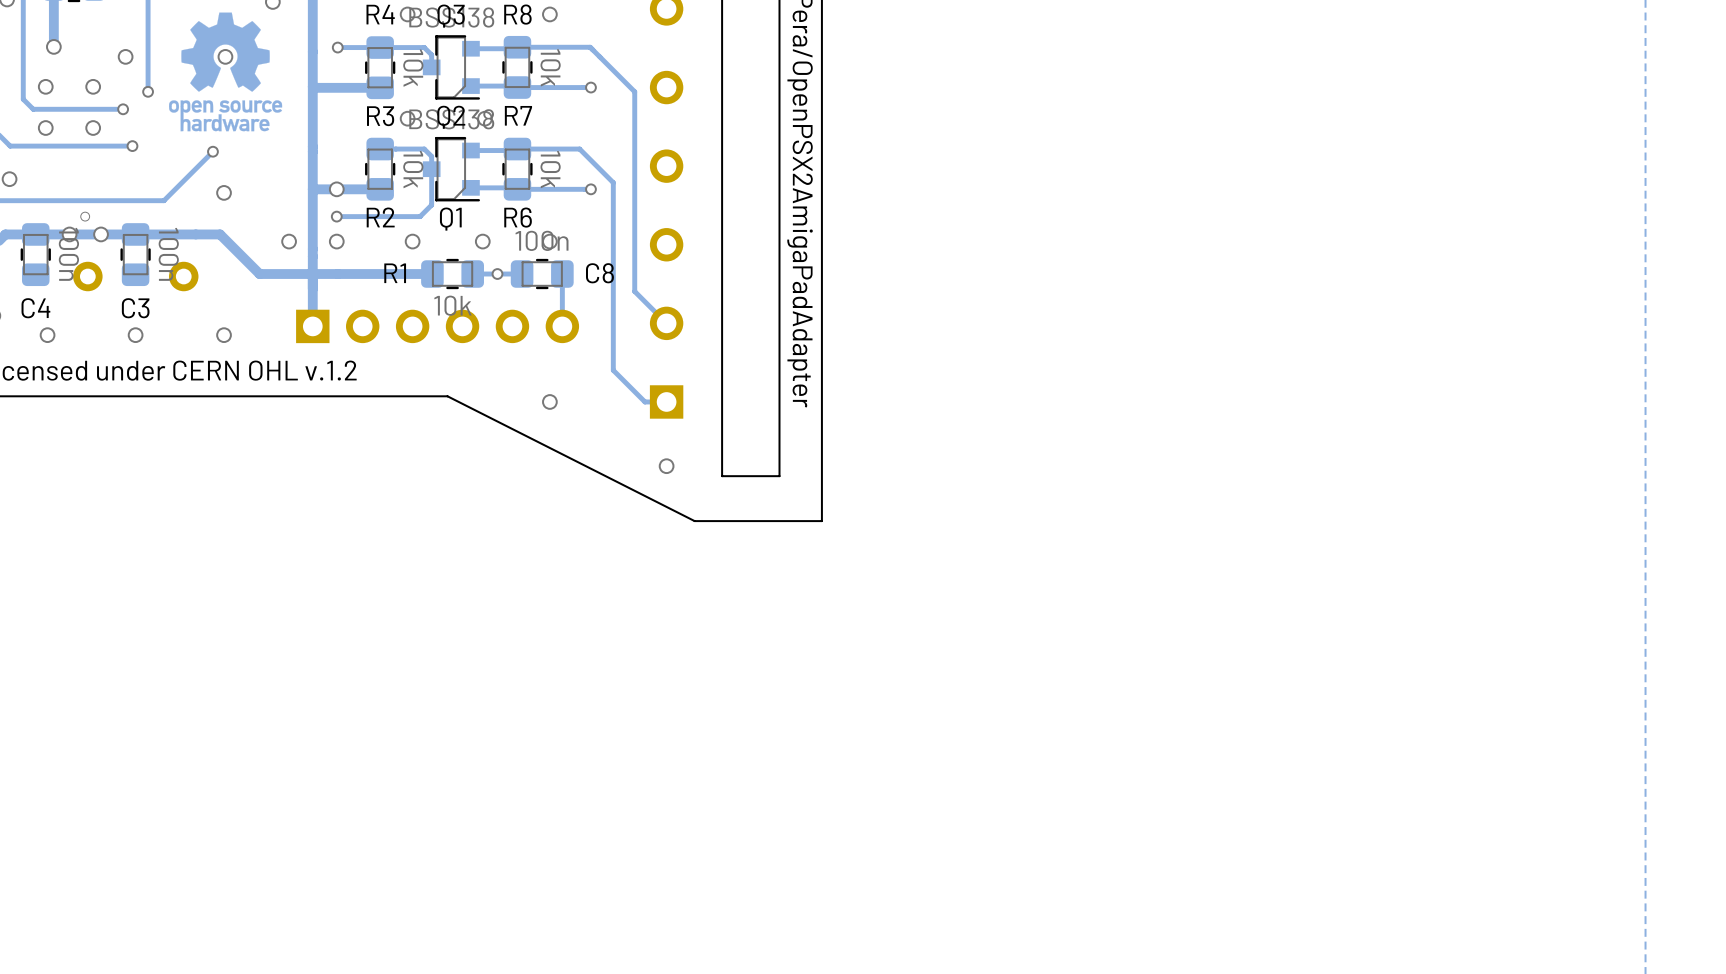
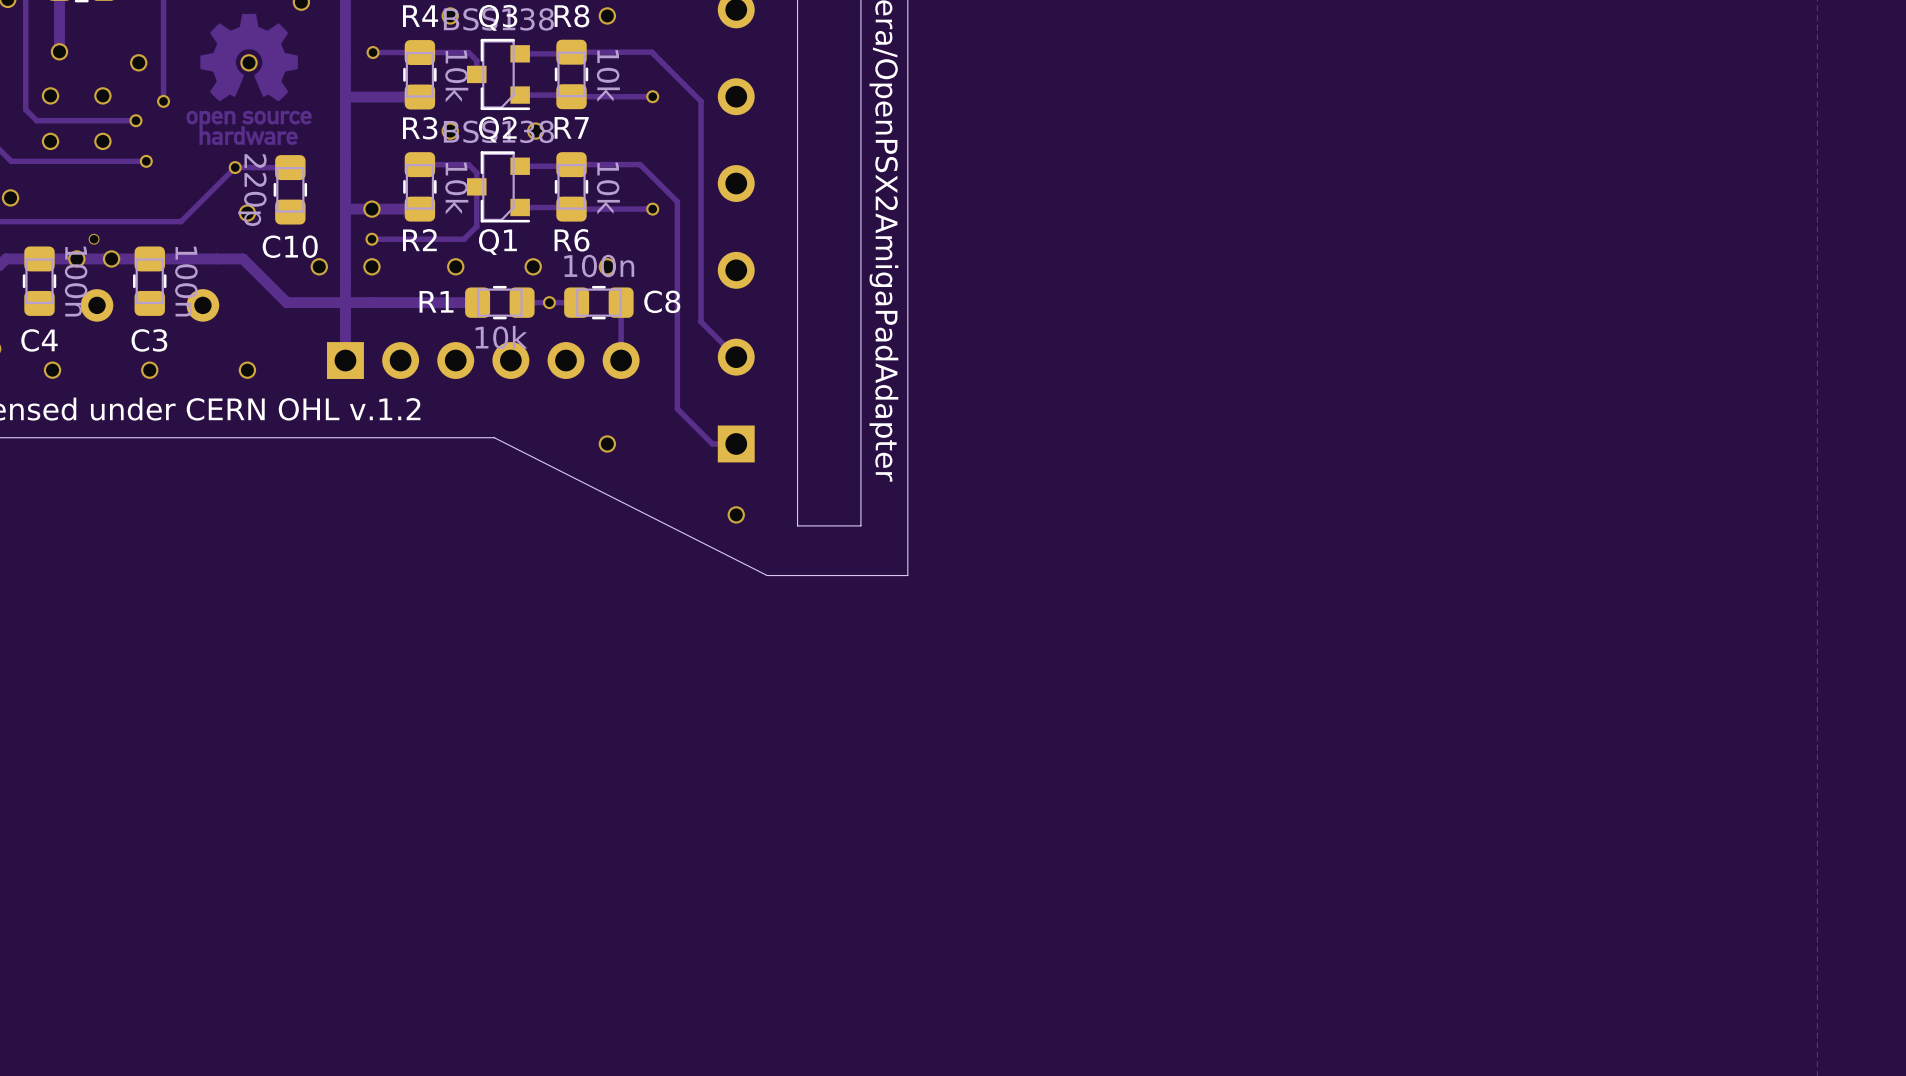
track: none -> (290, 167) (235, 167)
C10: none -> 220p (290, 189)

